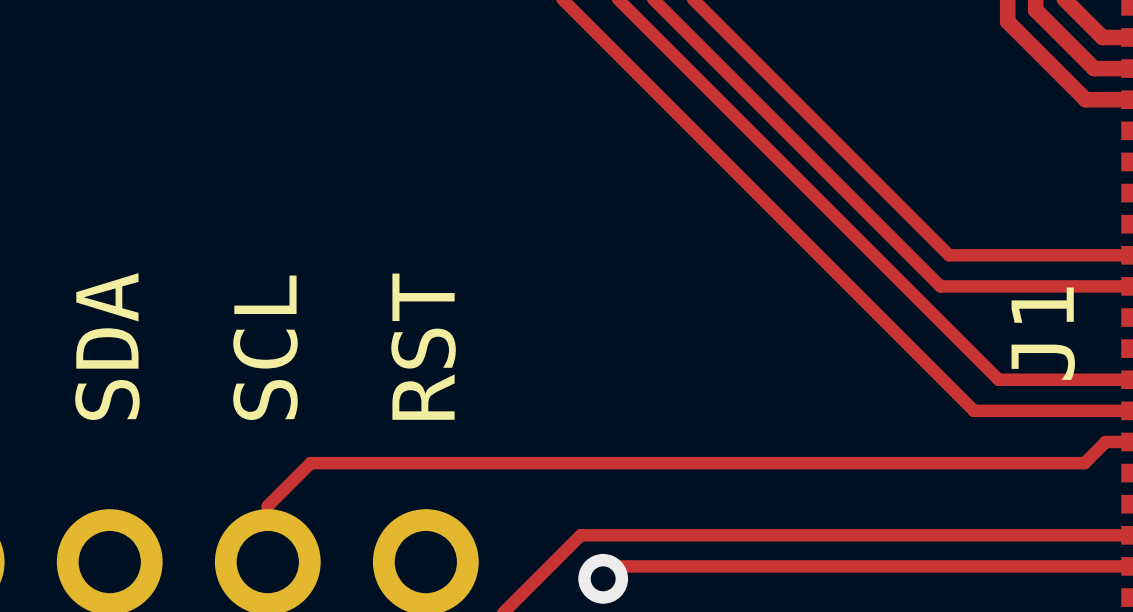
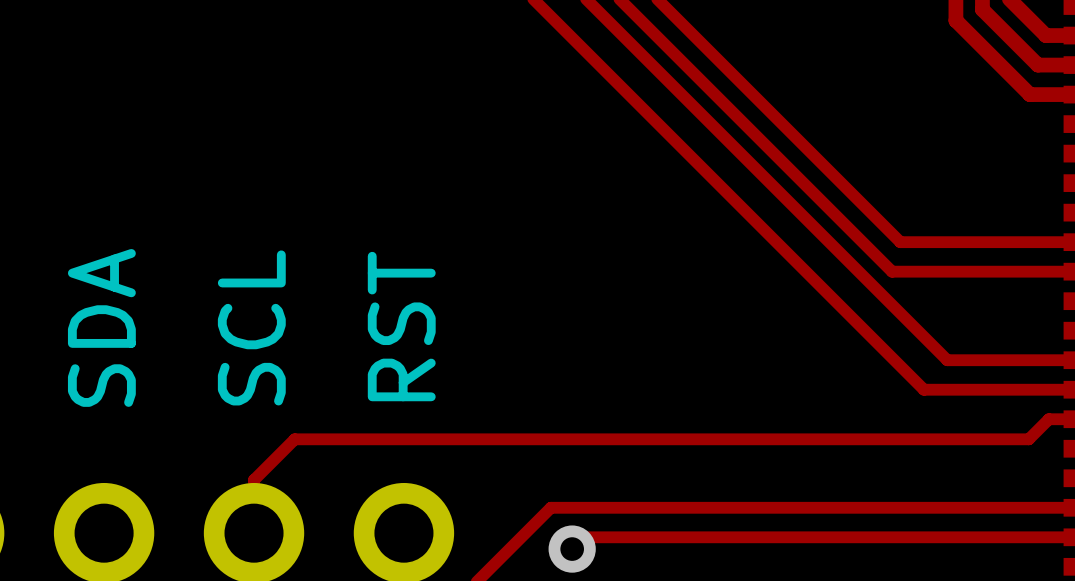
J1 name: J1 (1043, 333) -> none

